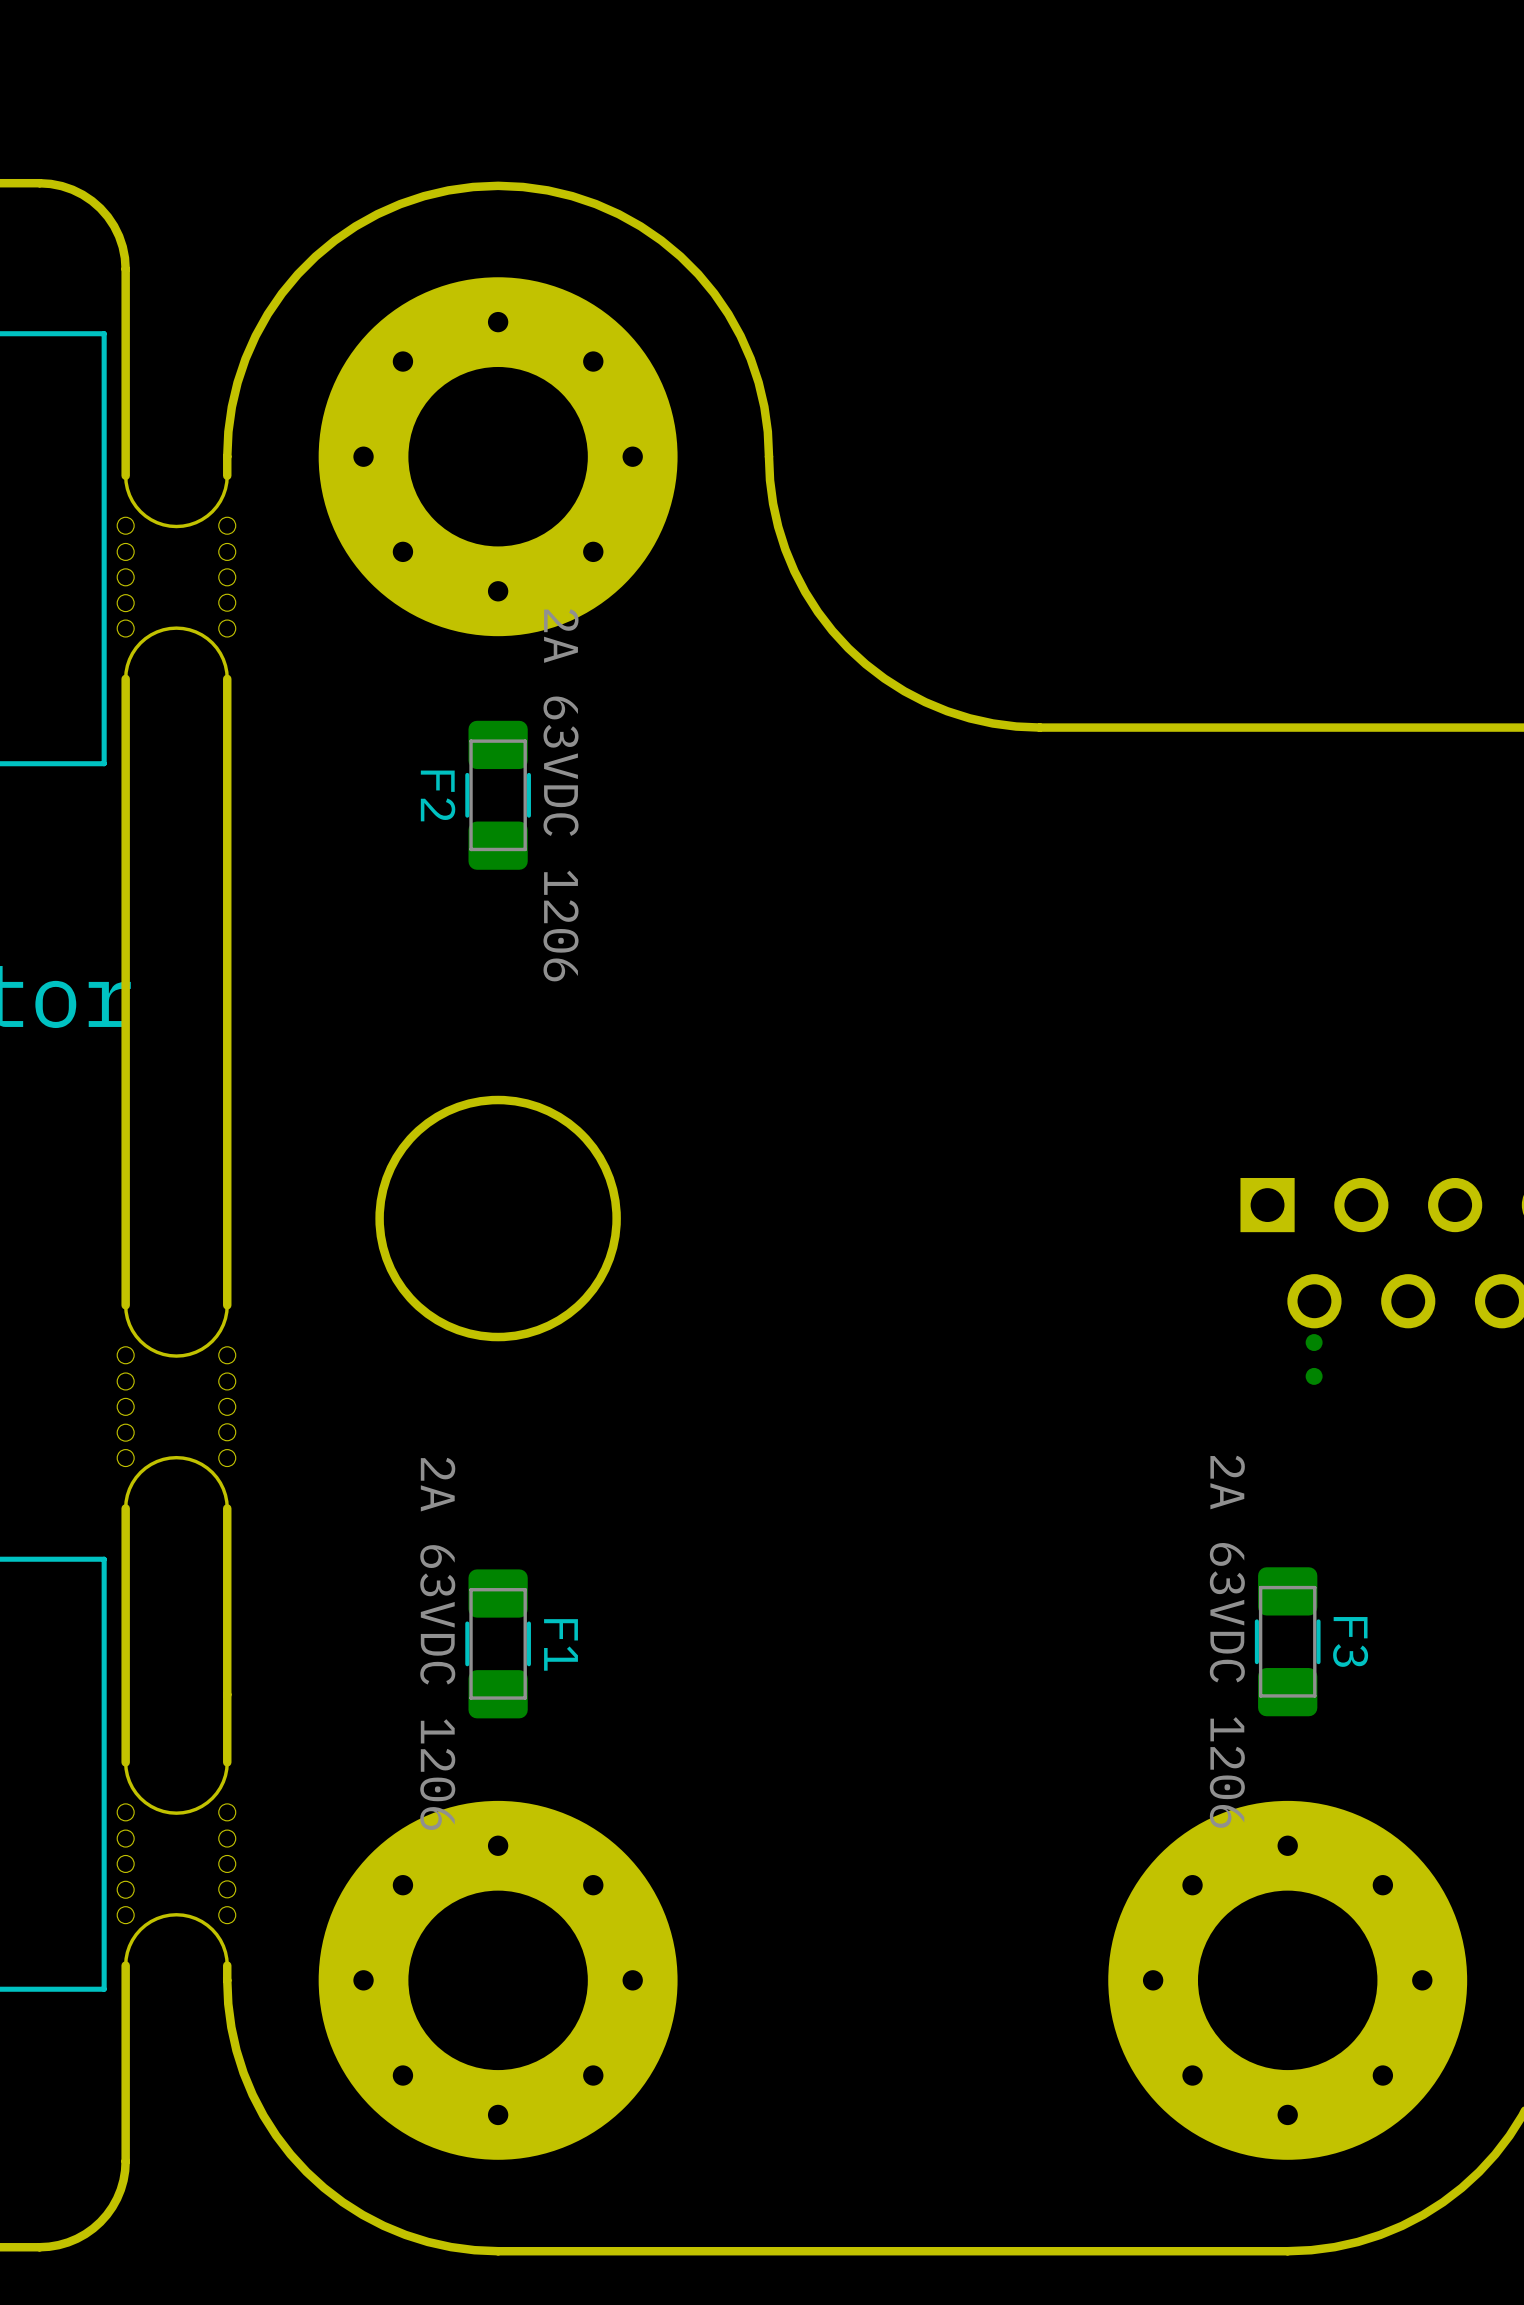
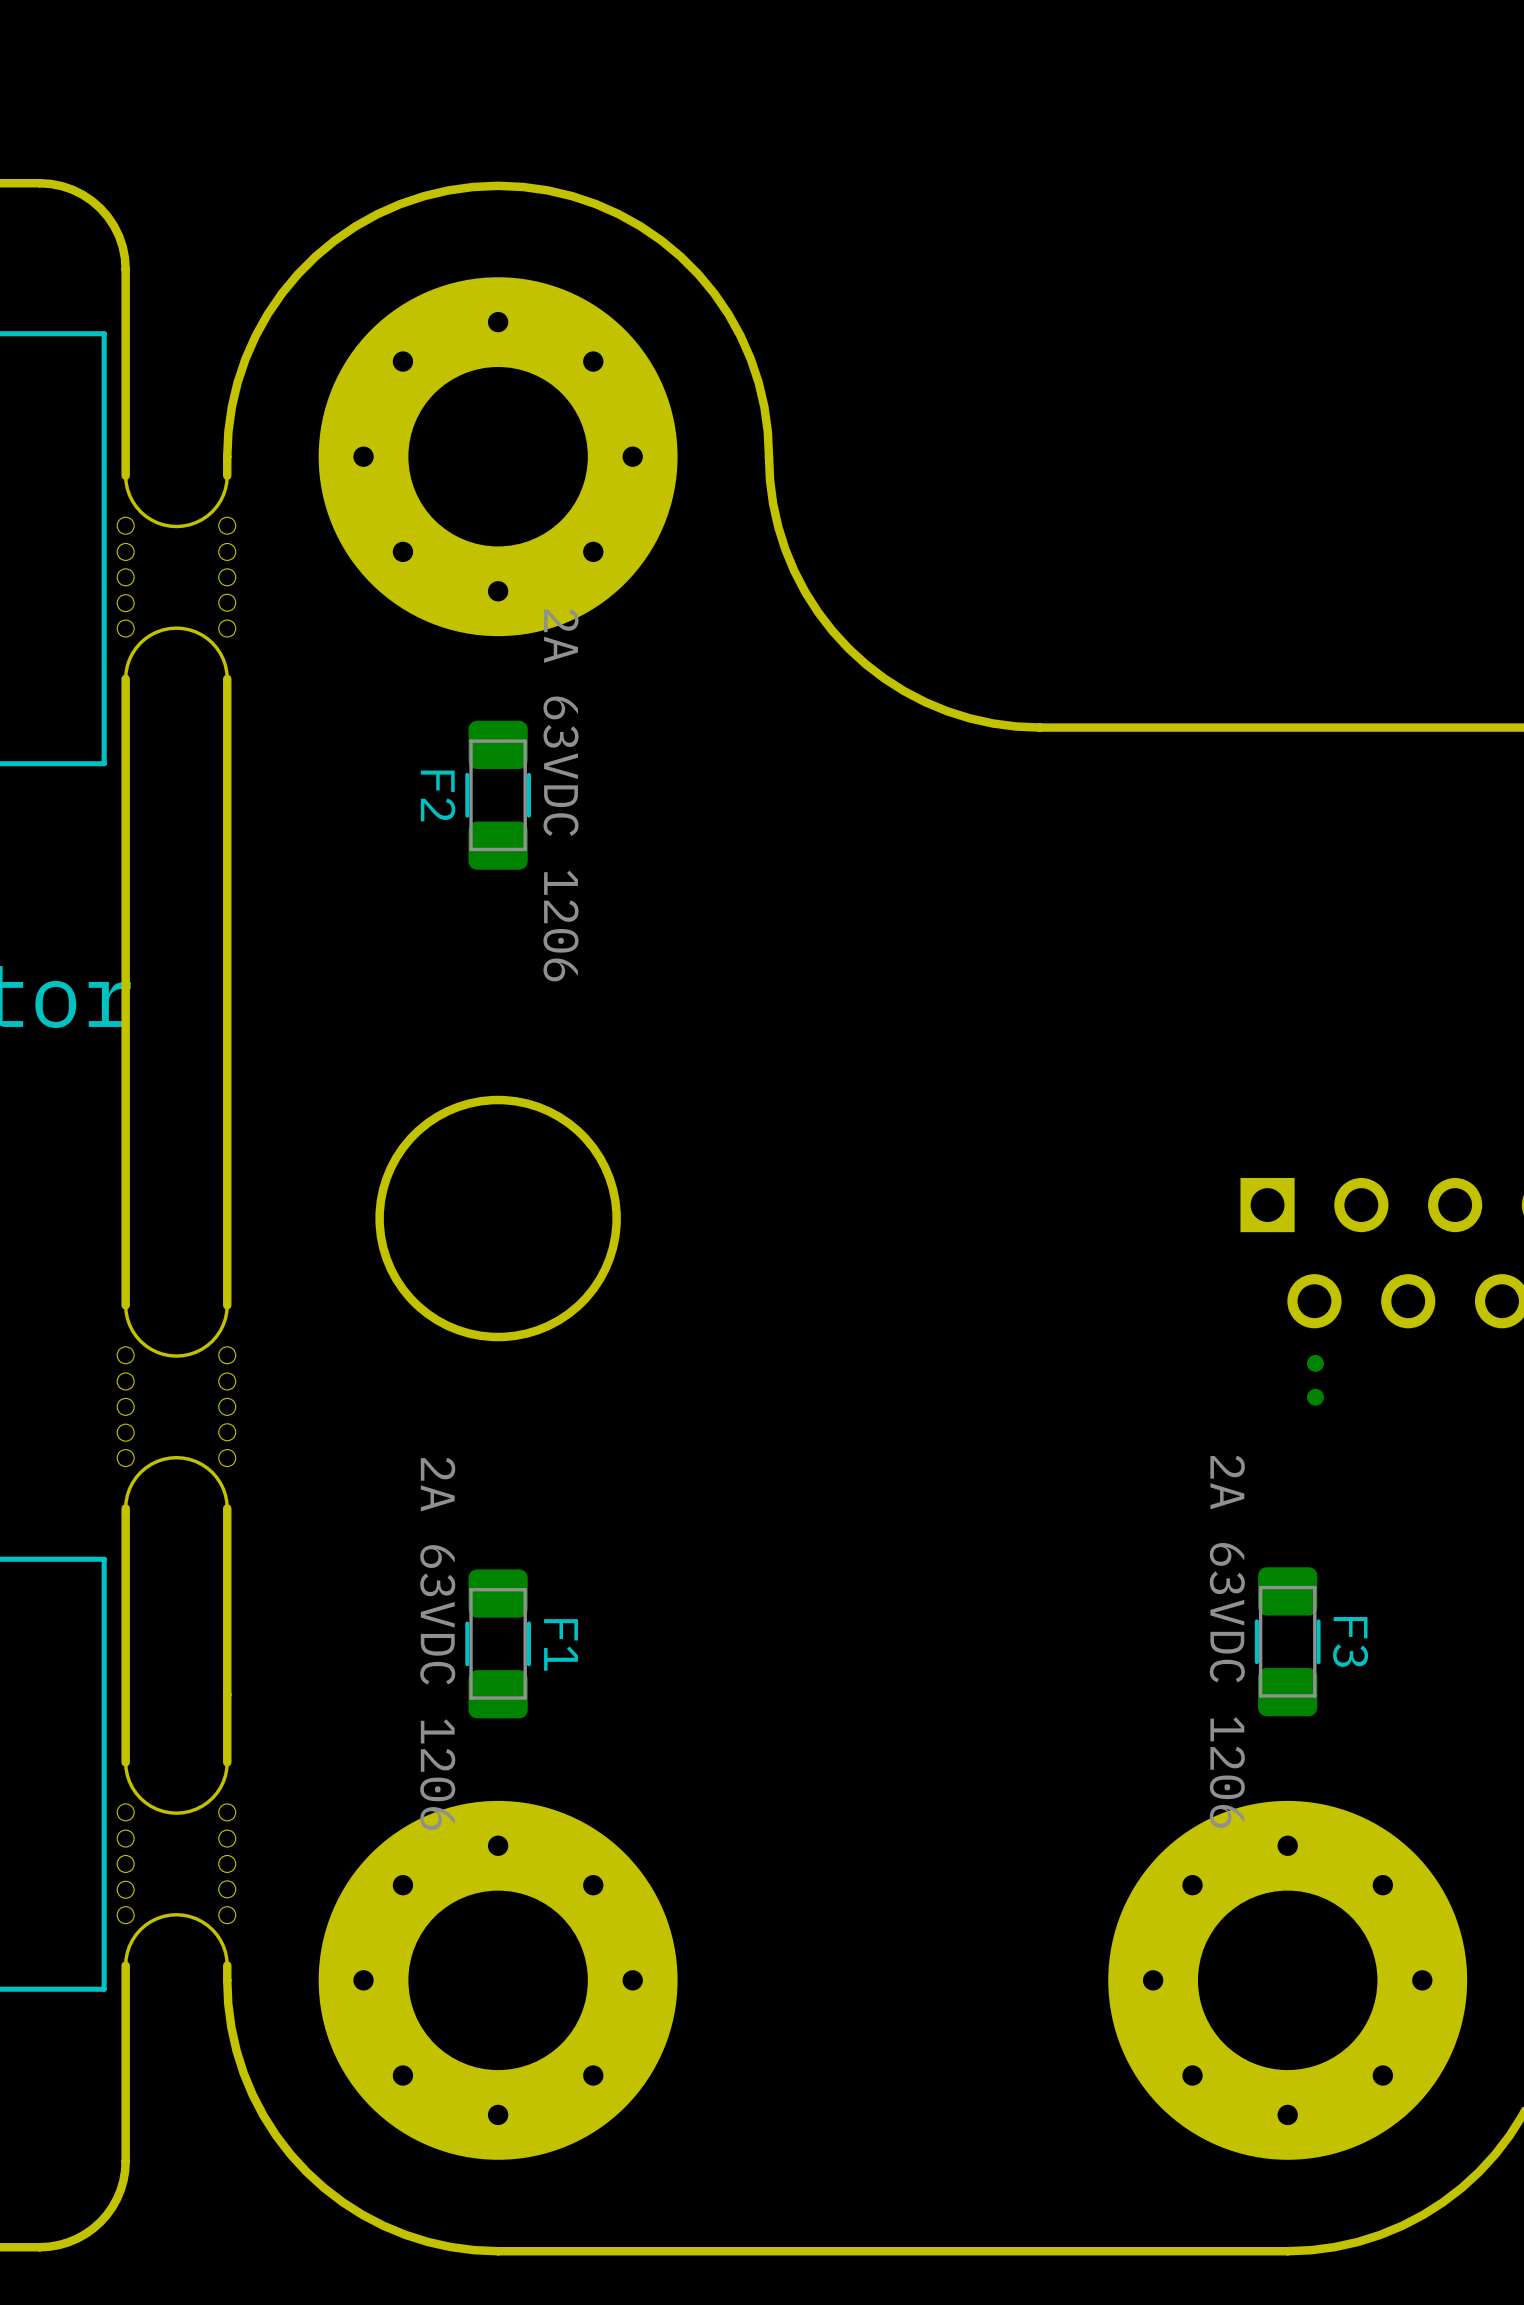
part position: (1314, 1359) -> (1315, 1380)

